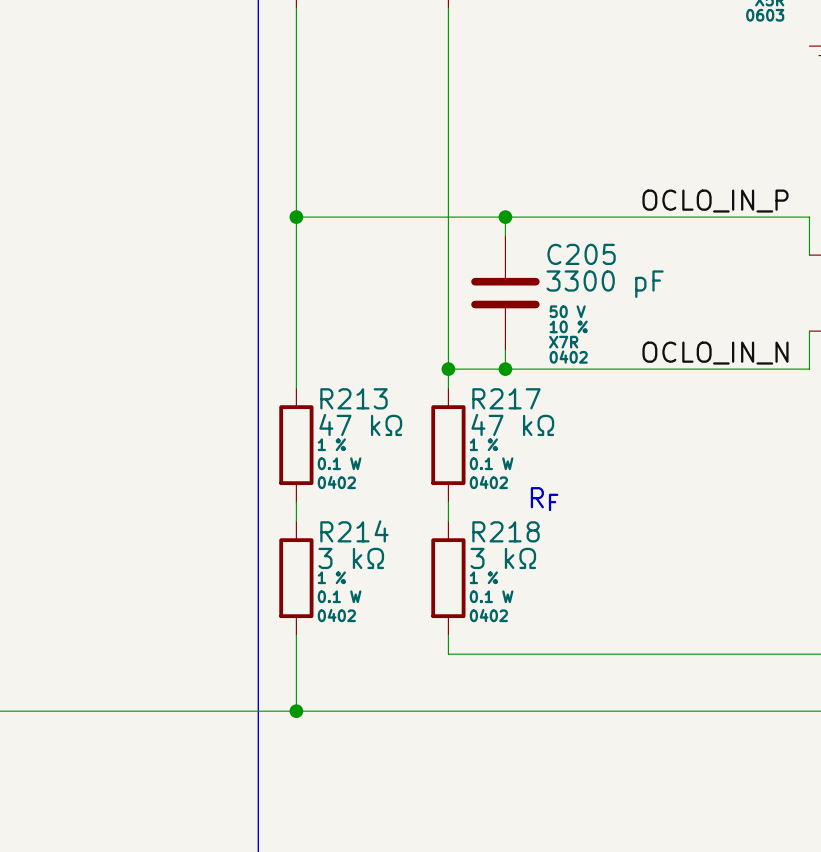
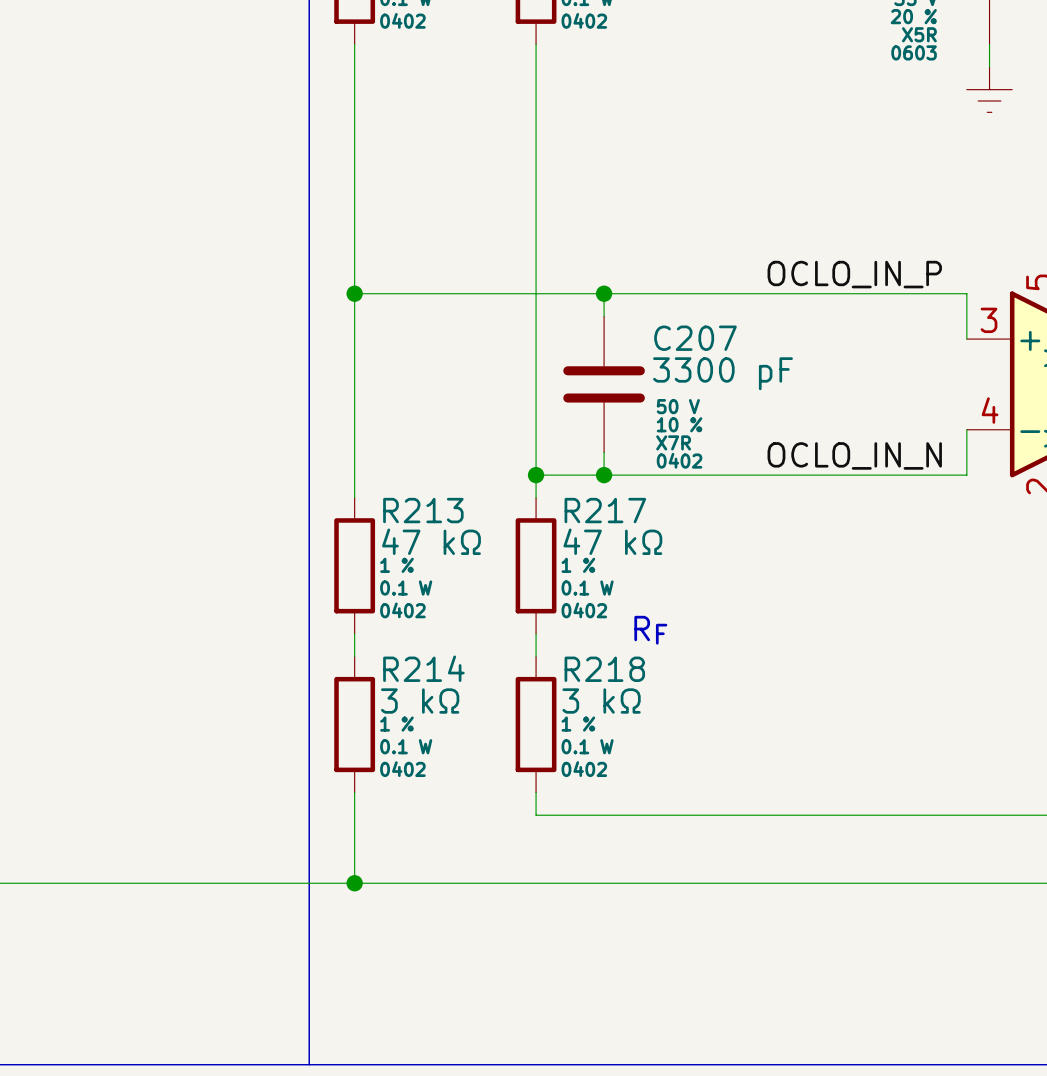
C205 name: C205 (581, 254) -> C207 (695, 338)

